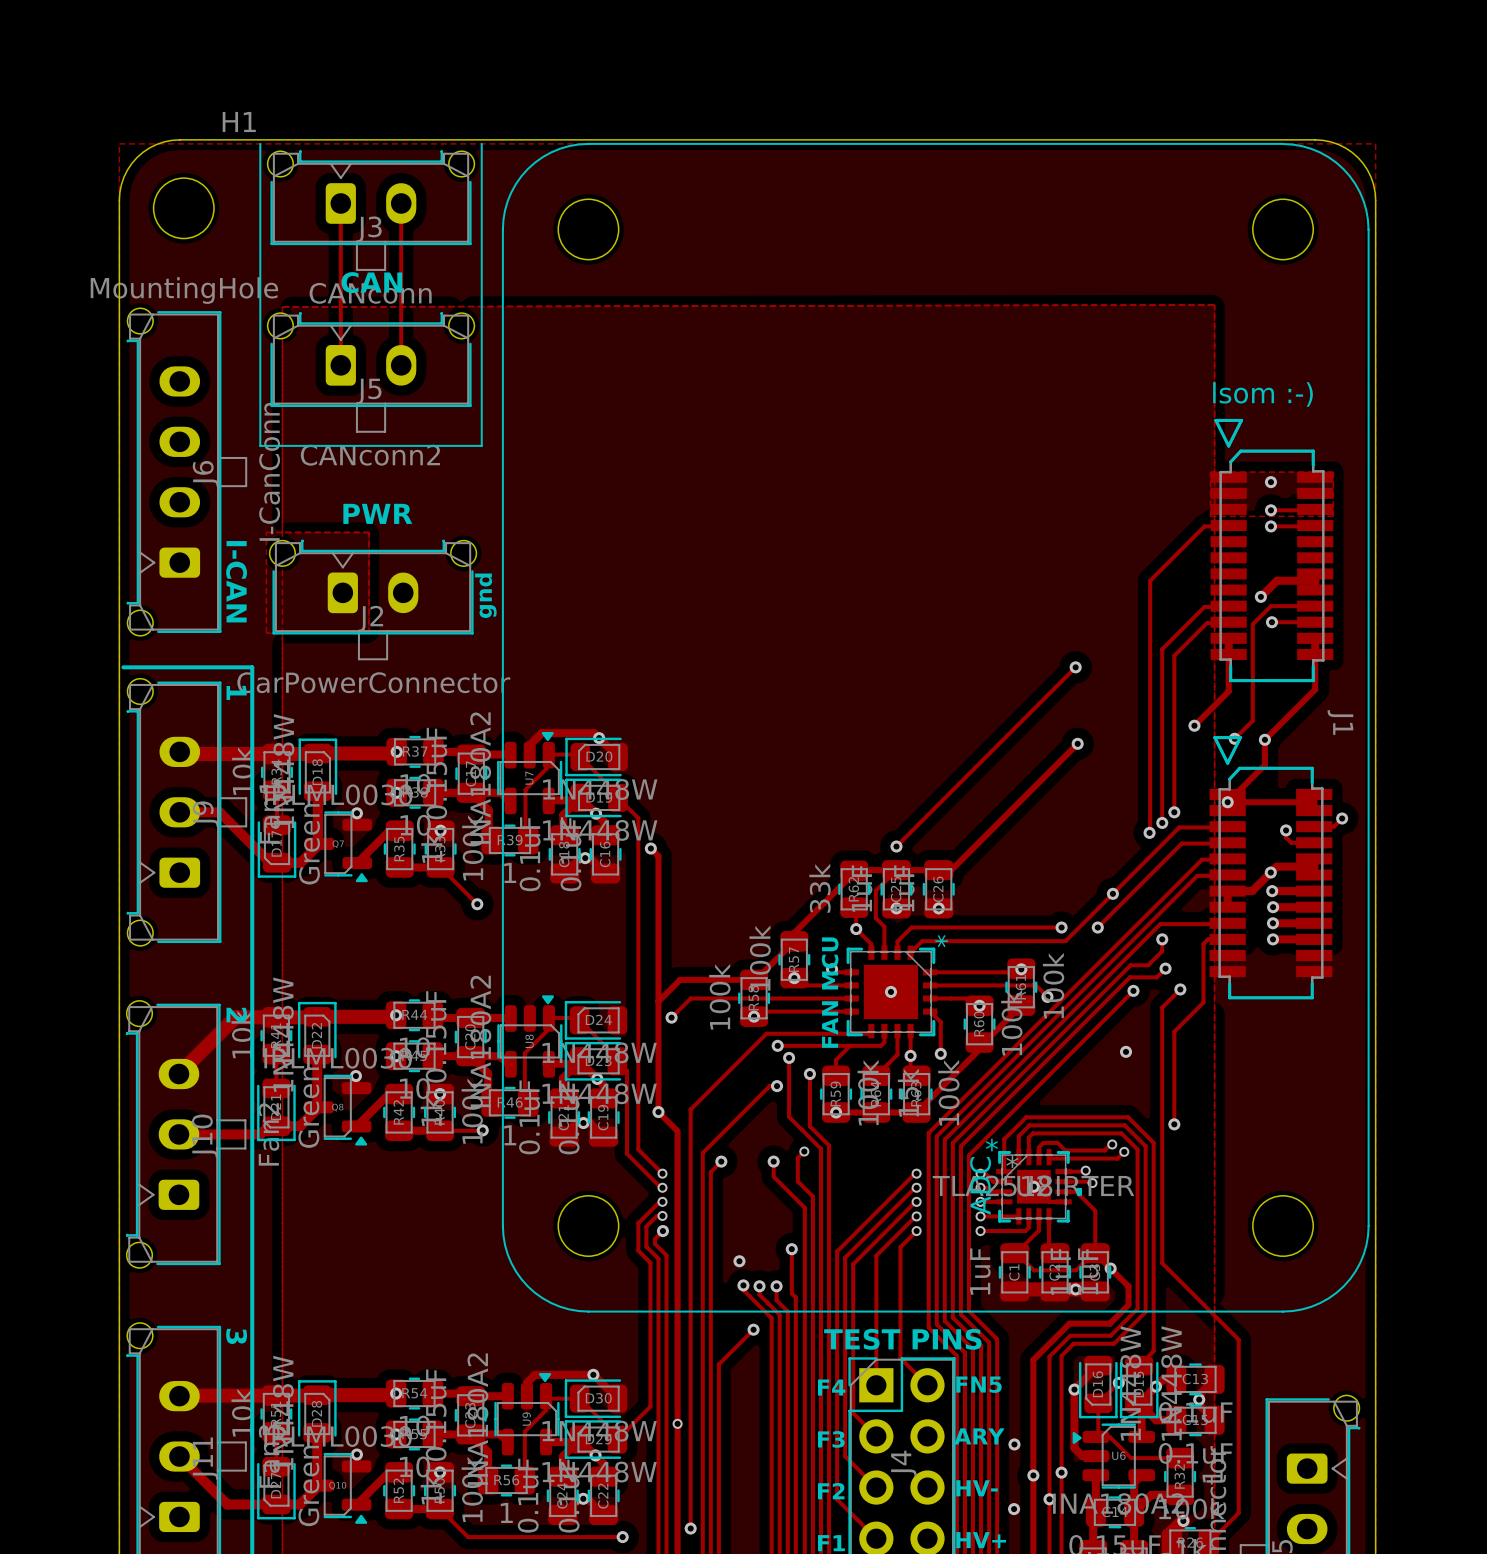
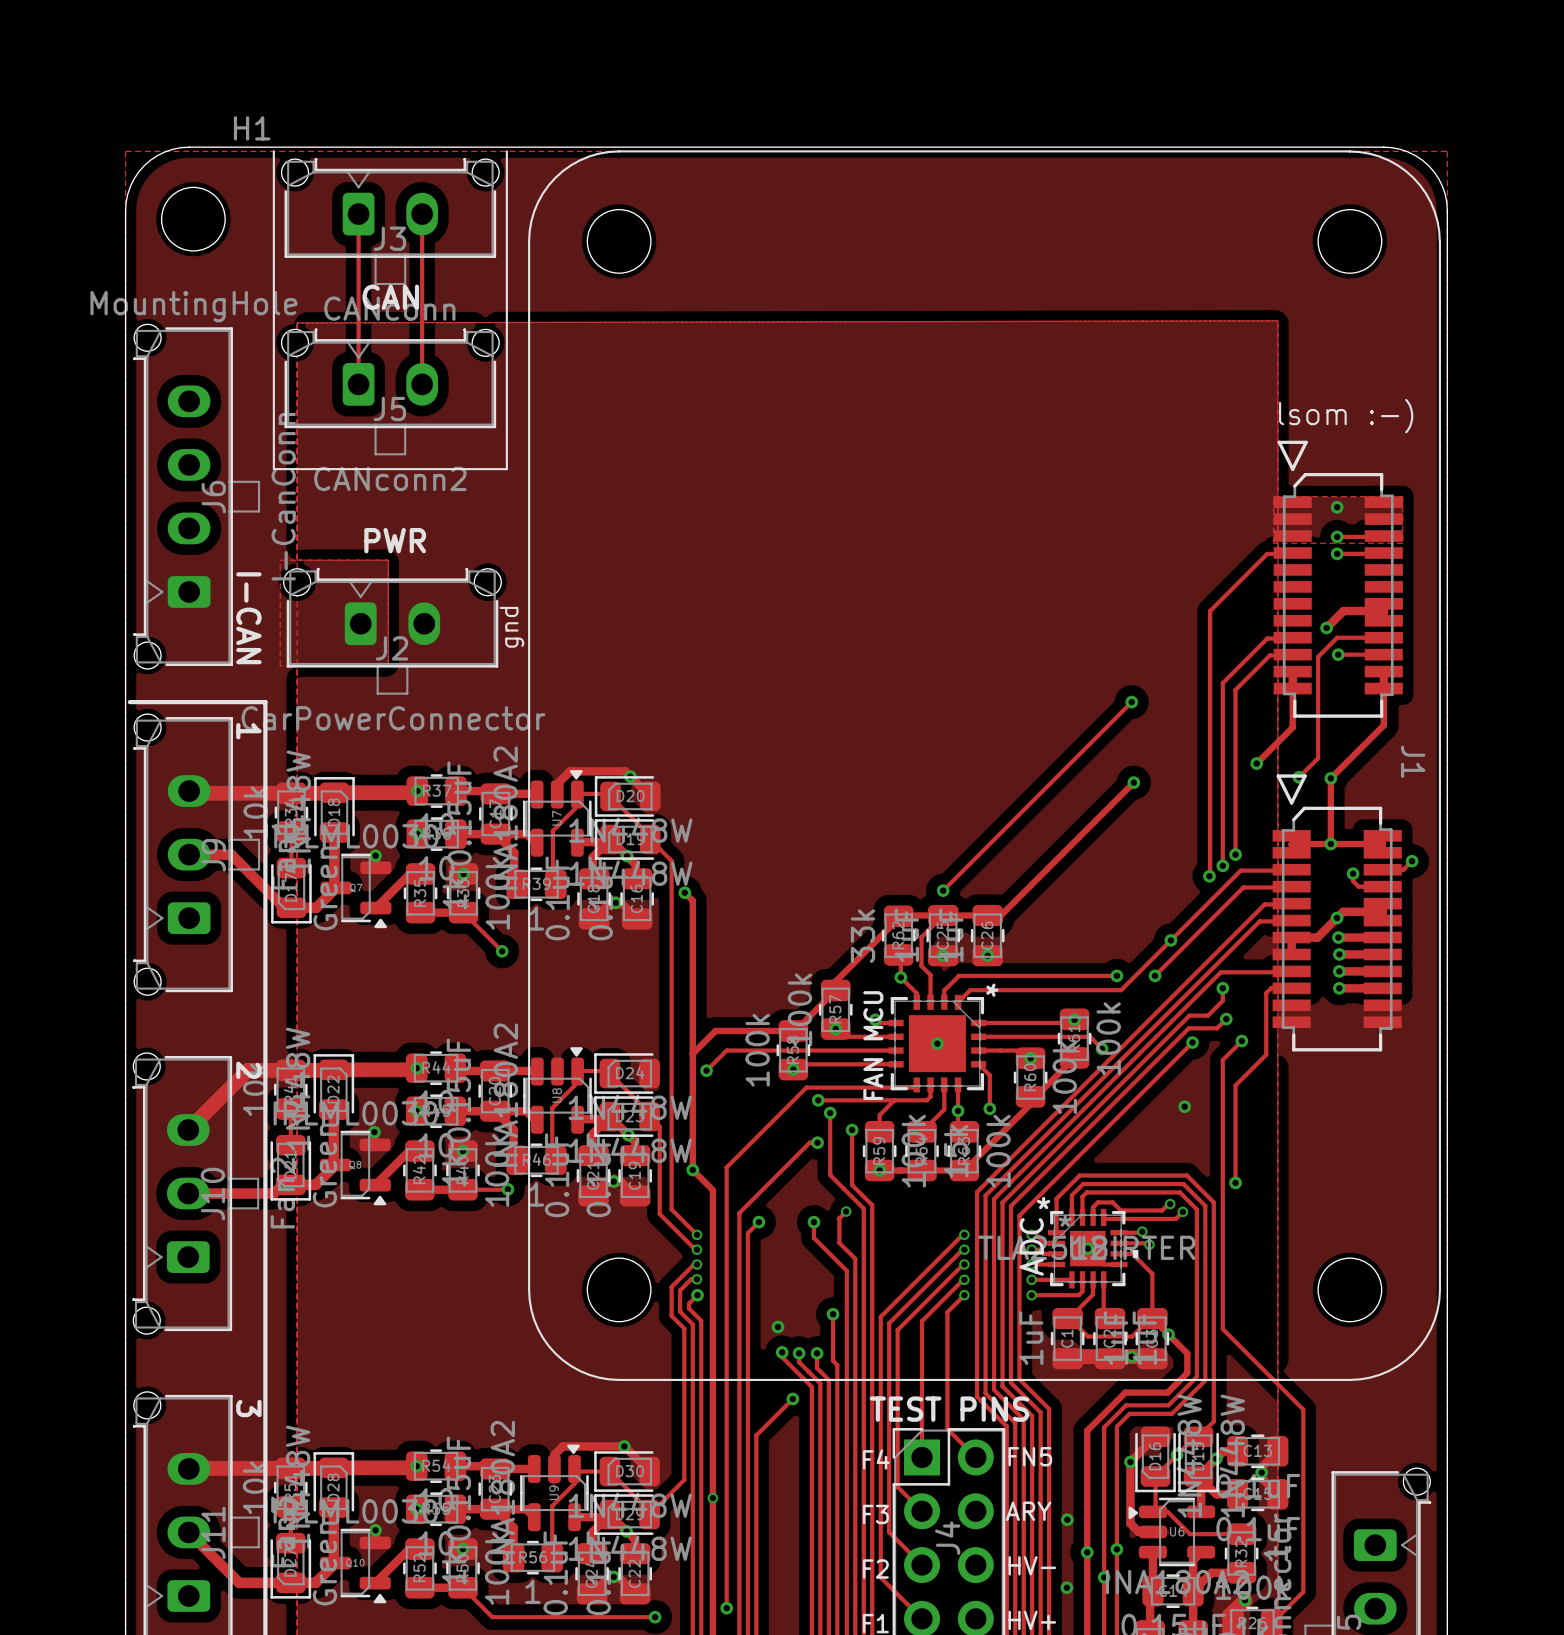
track: (1264, 764) (1227, 802) -> (1330, 804) (1330, 844)
via position: (1227, 802) -> (1330, 844)

